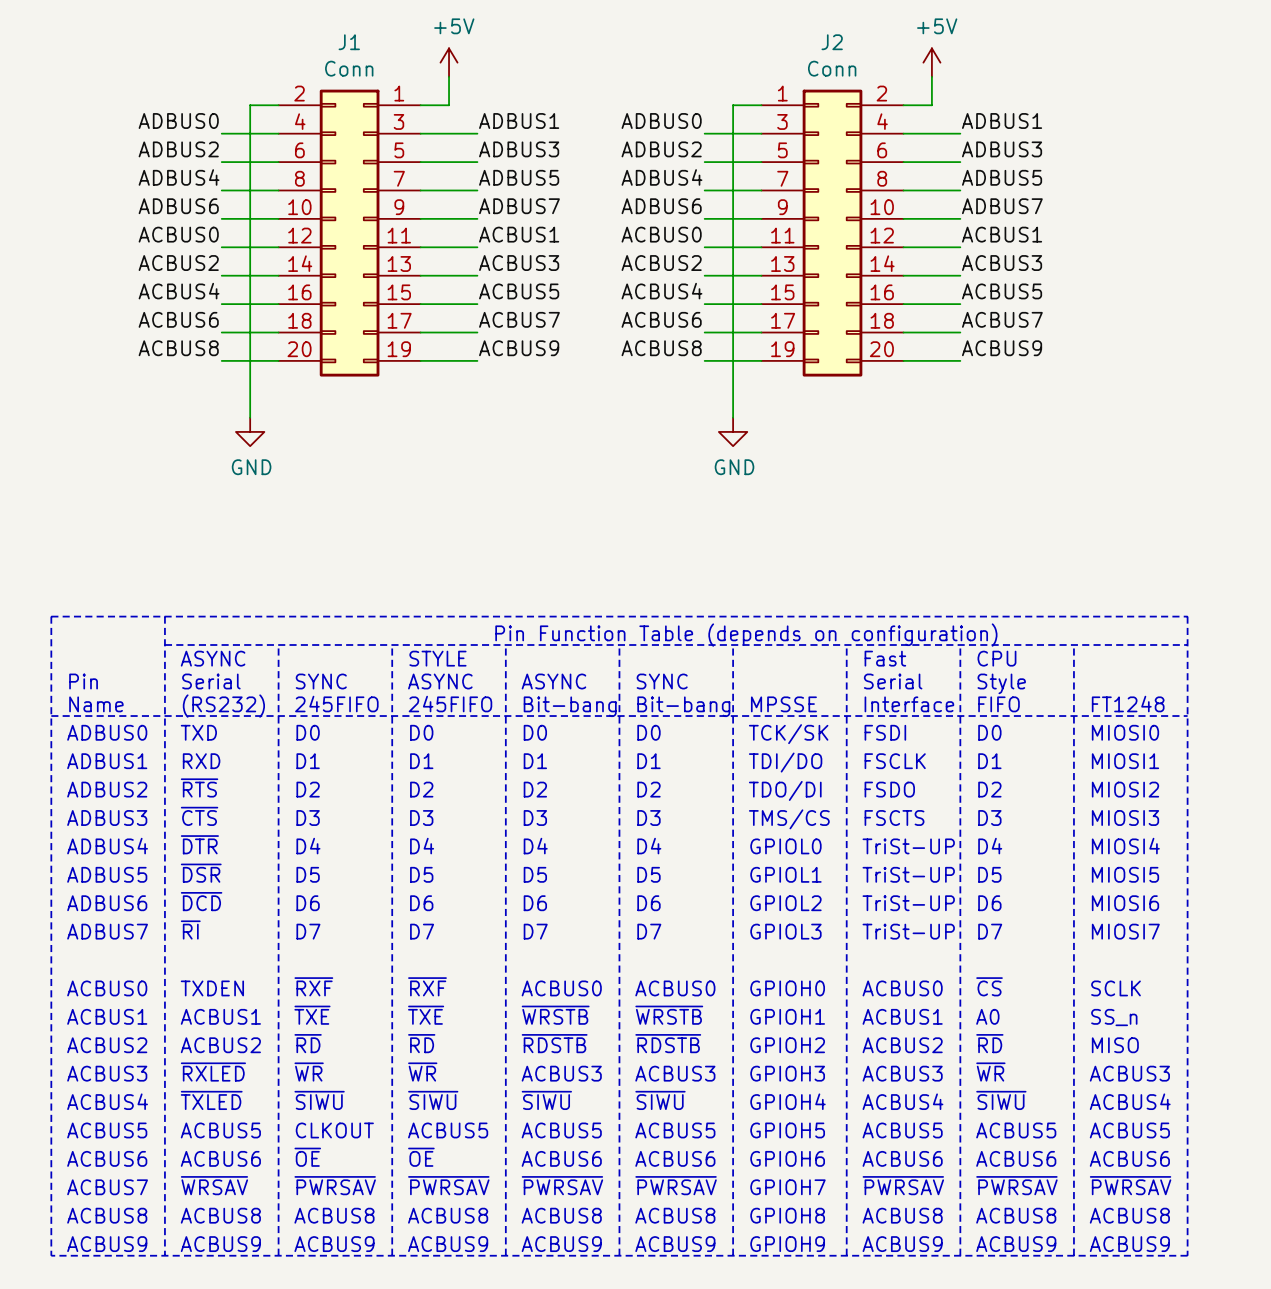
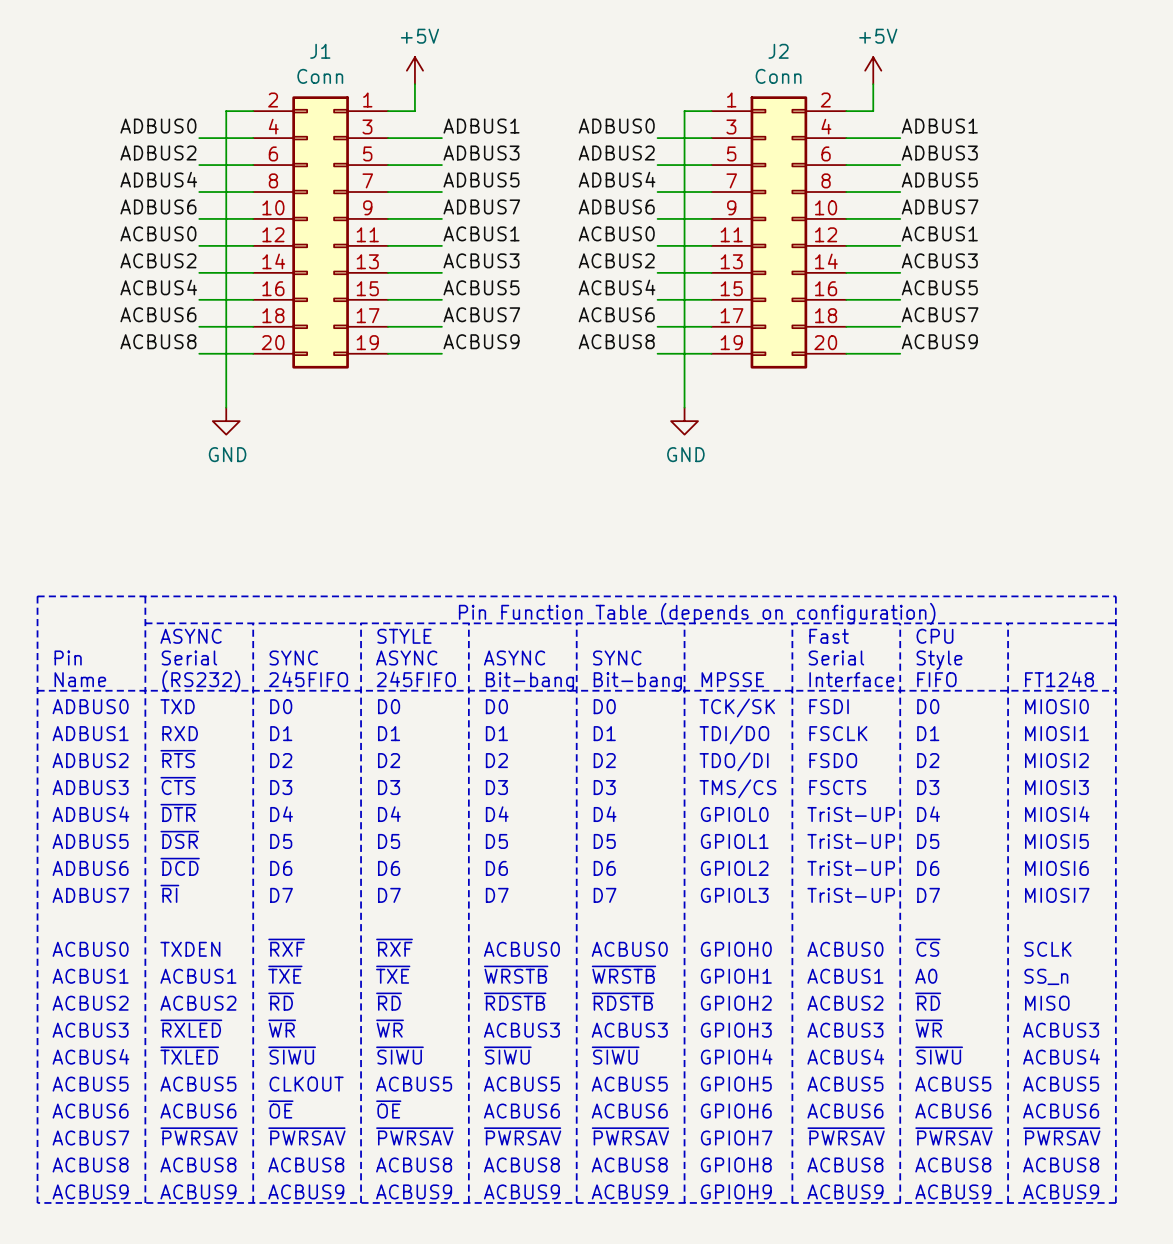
text: ~{WRSAV} (214, 1185) -> ~{PWRSAV} (199, 1136)

